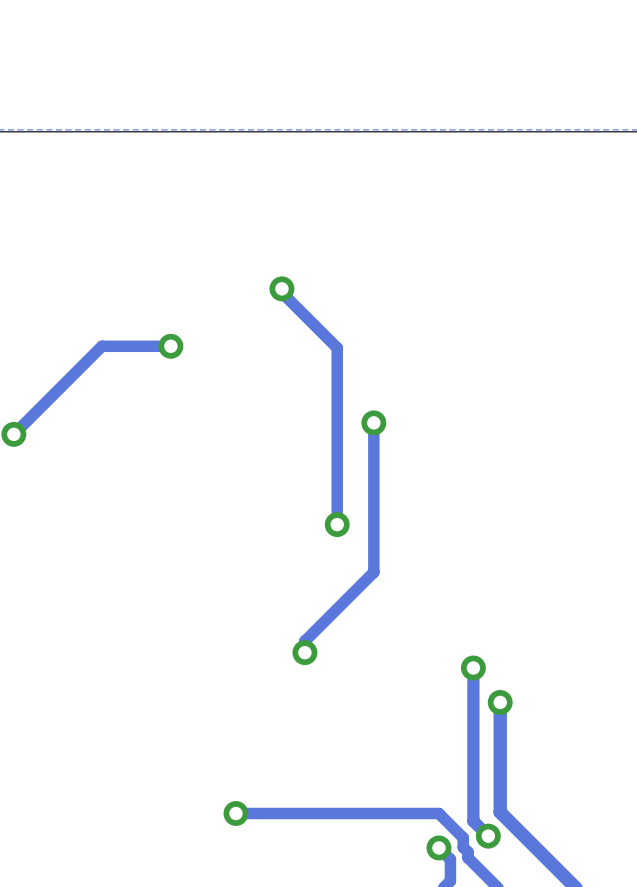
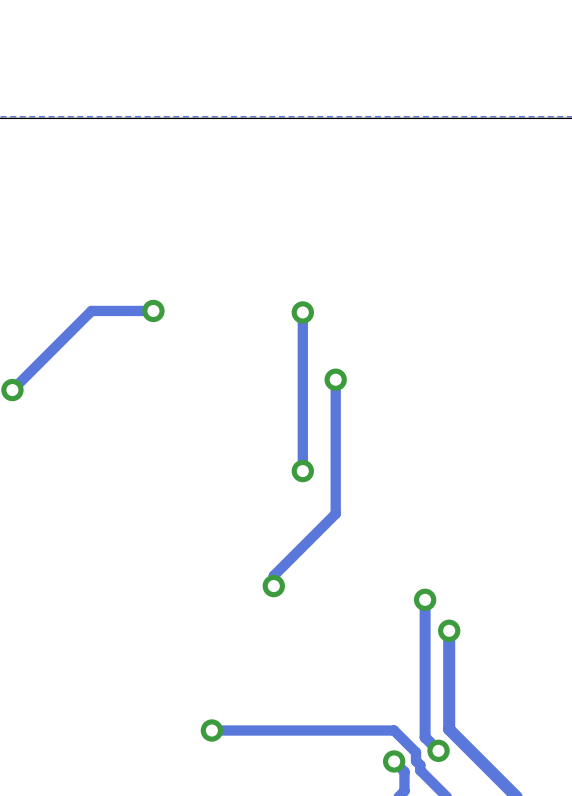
track: (281, 288) (281, 292) (337, 347) -> none
via position: (281, 288) -> (302, 312)

